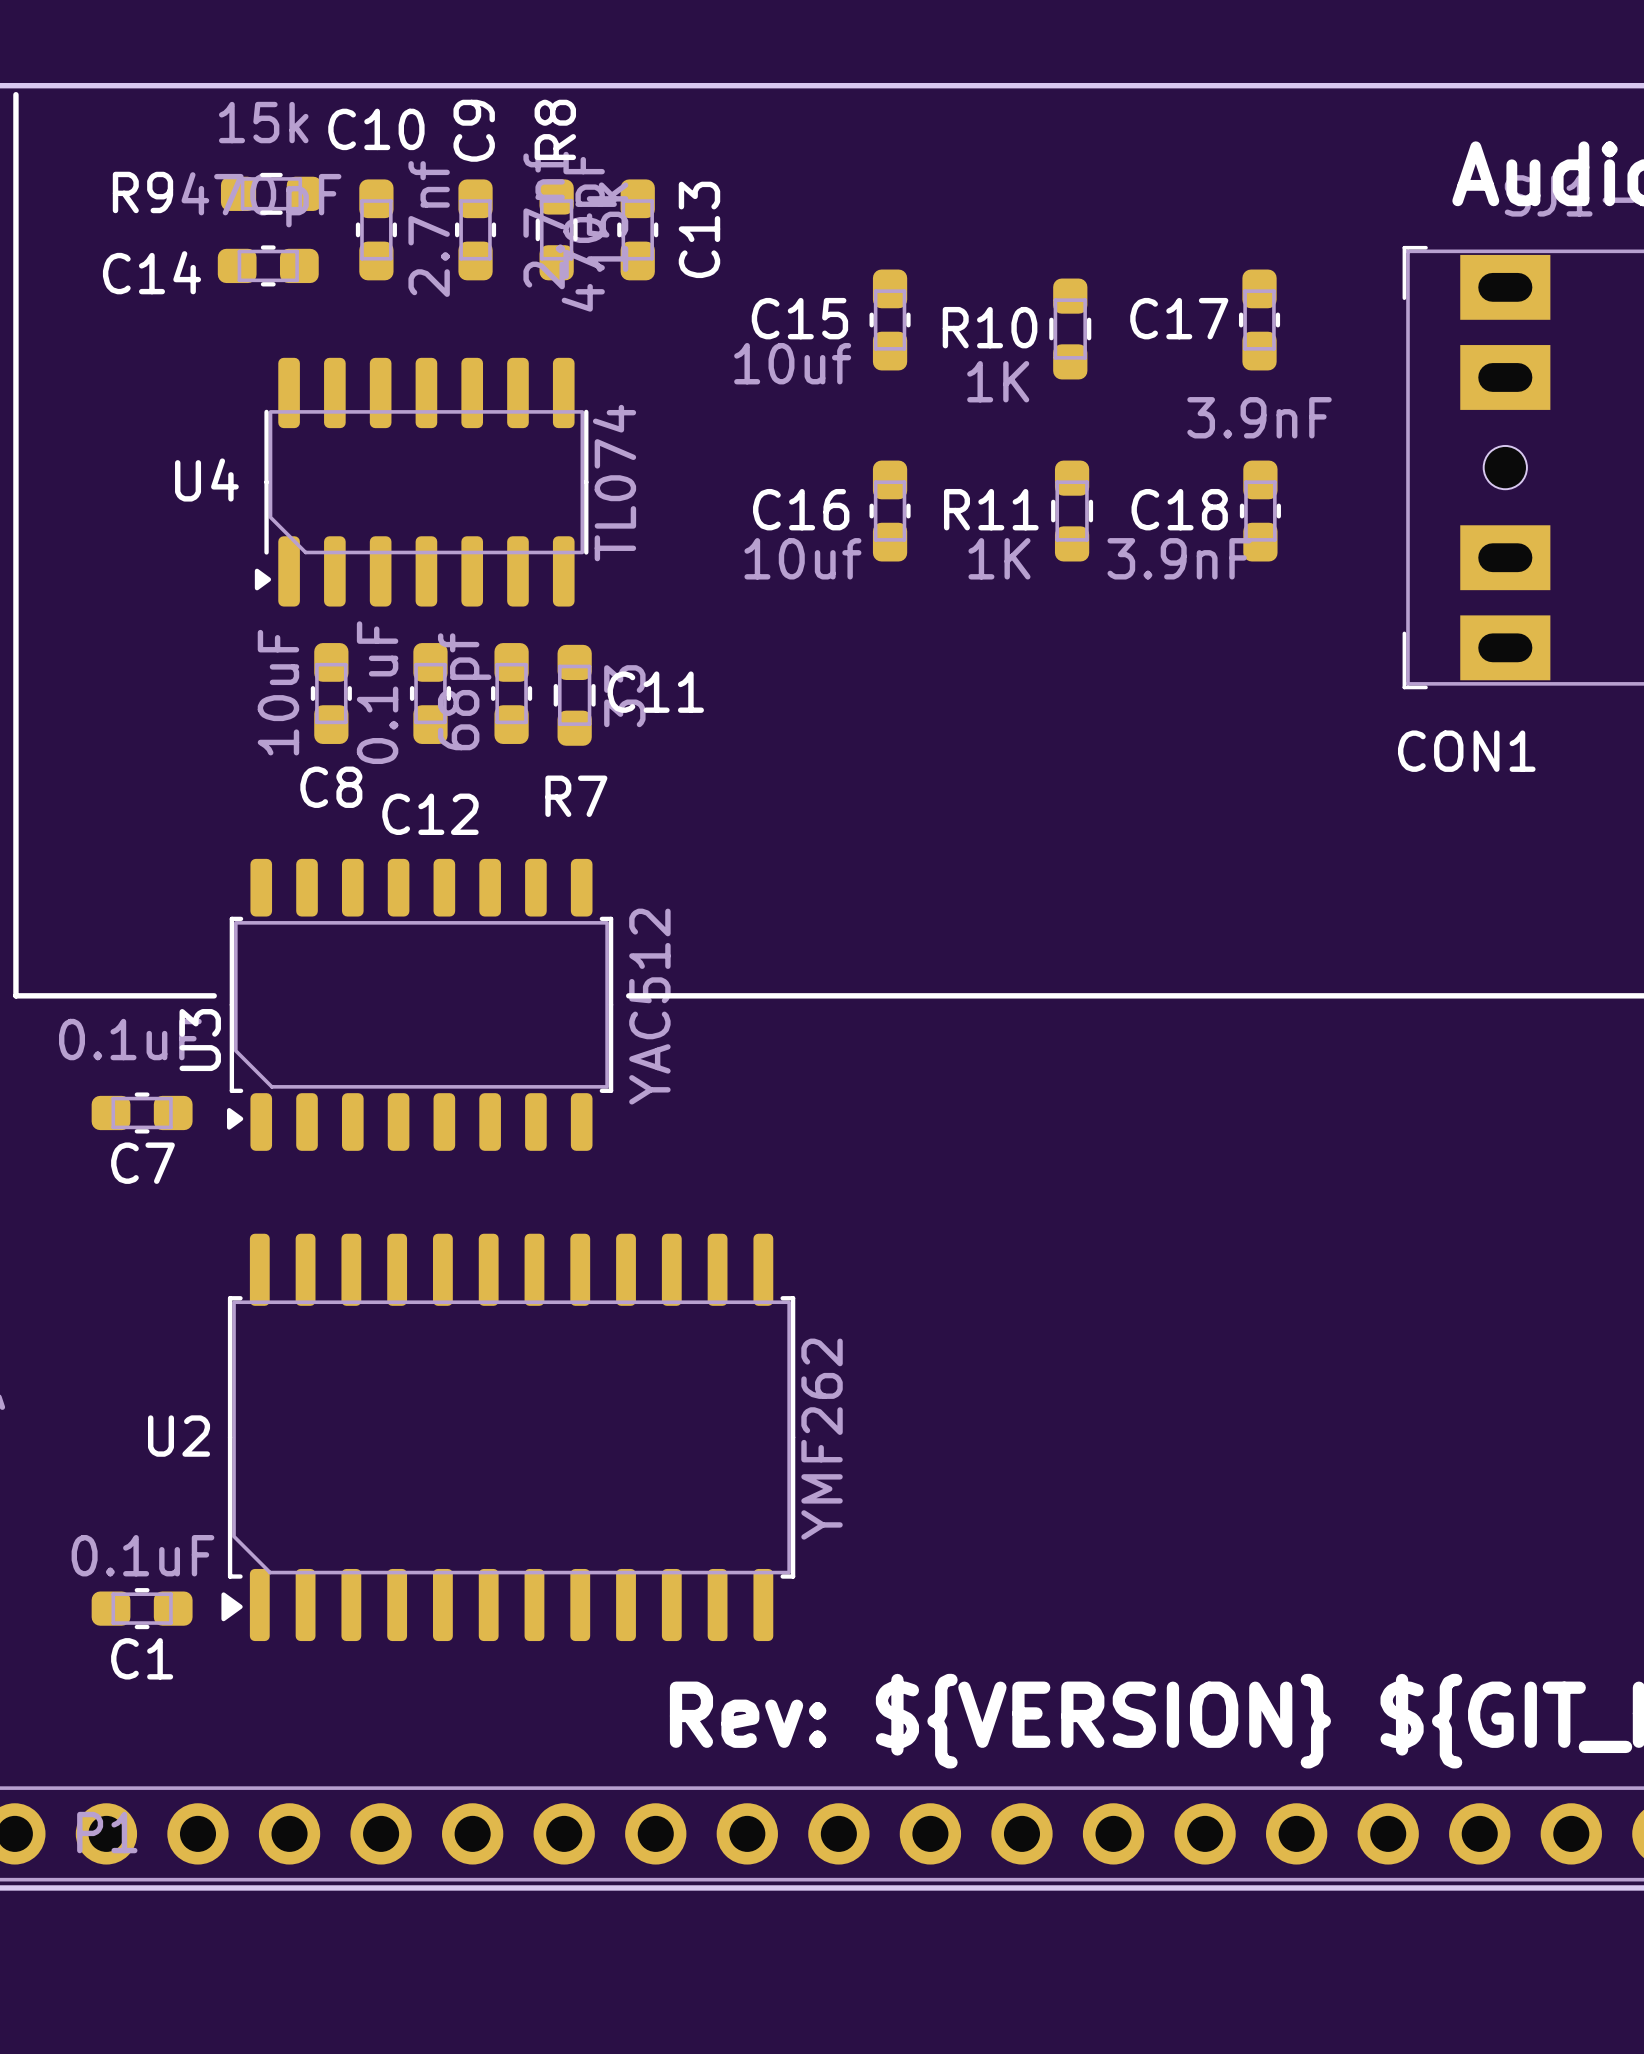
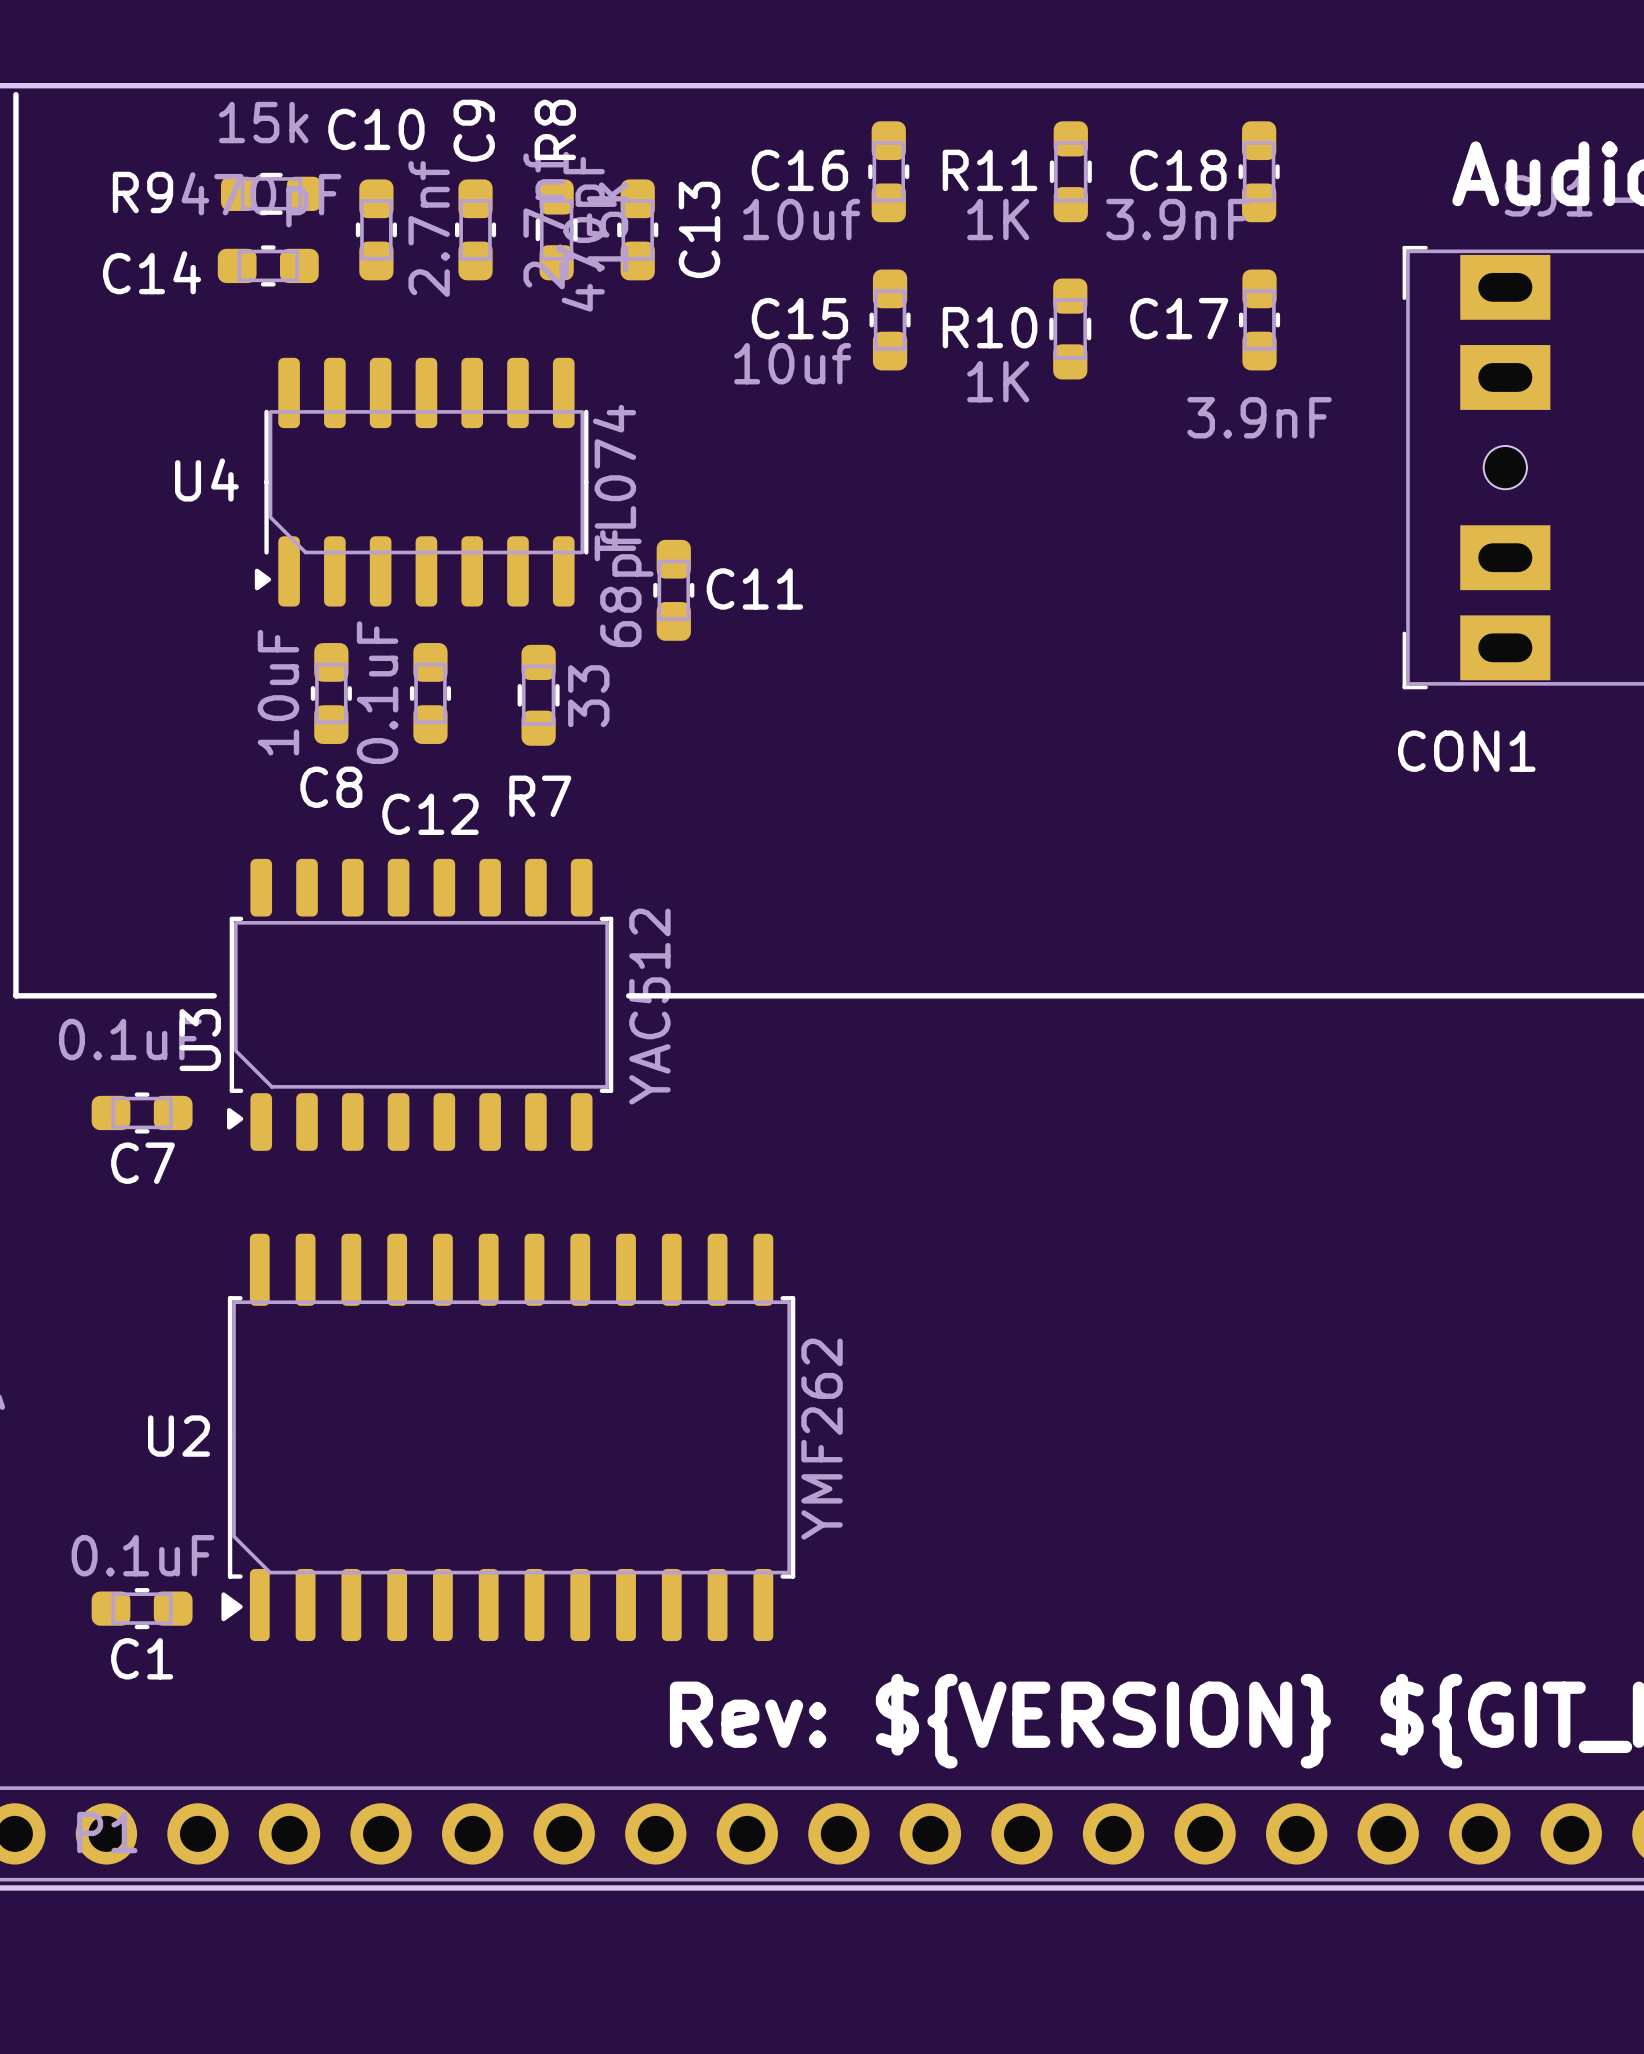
C16 position: (890, 511) -> (888, 171)
R11 position: (1072, 511) -> (1070, 171)
C18 position: (1260, 511) -> (1259, 171)
C11 name position: C11 (655, 692) -> C11 (754, 588)
C11 position: (511, 693) -> (673, 590)
R7 position: (574, 695) -> (538, 695)

